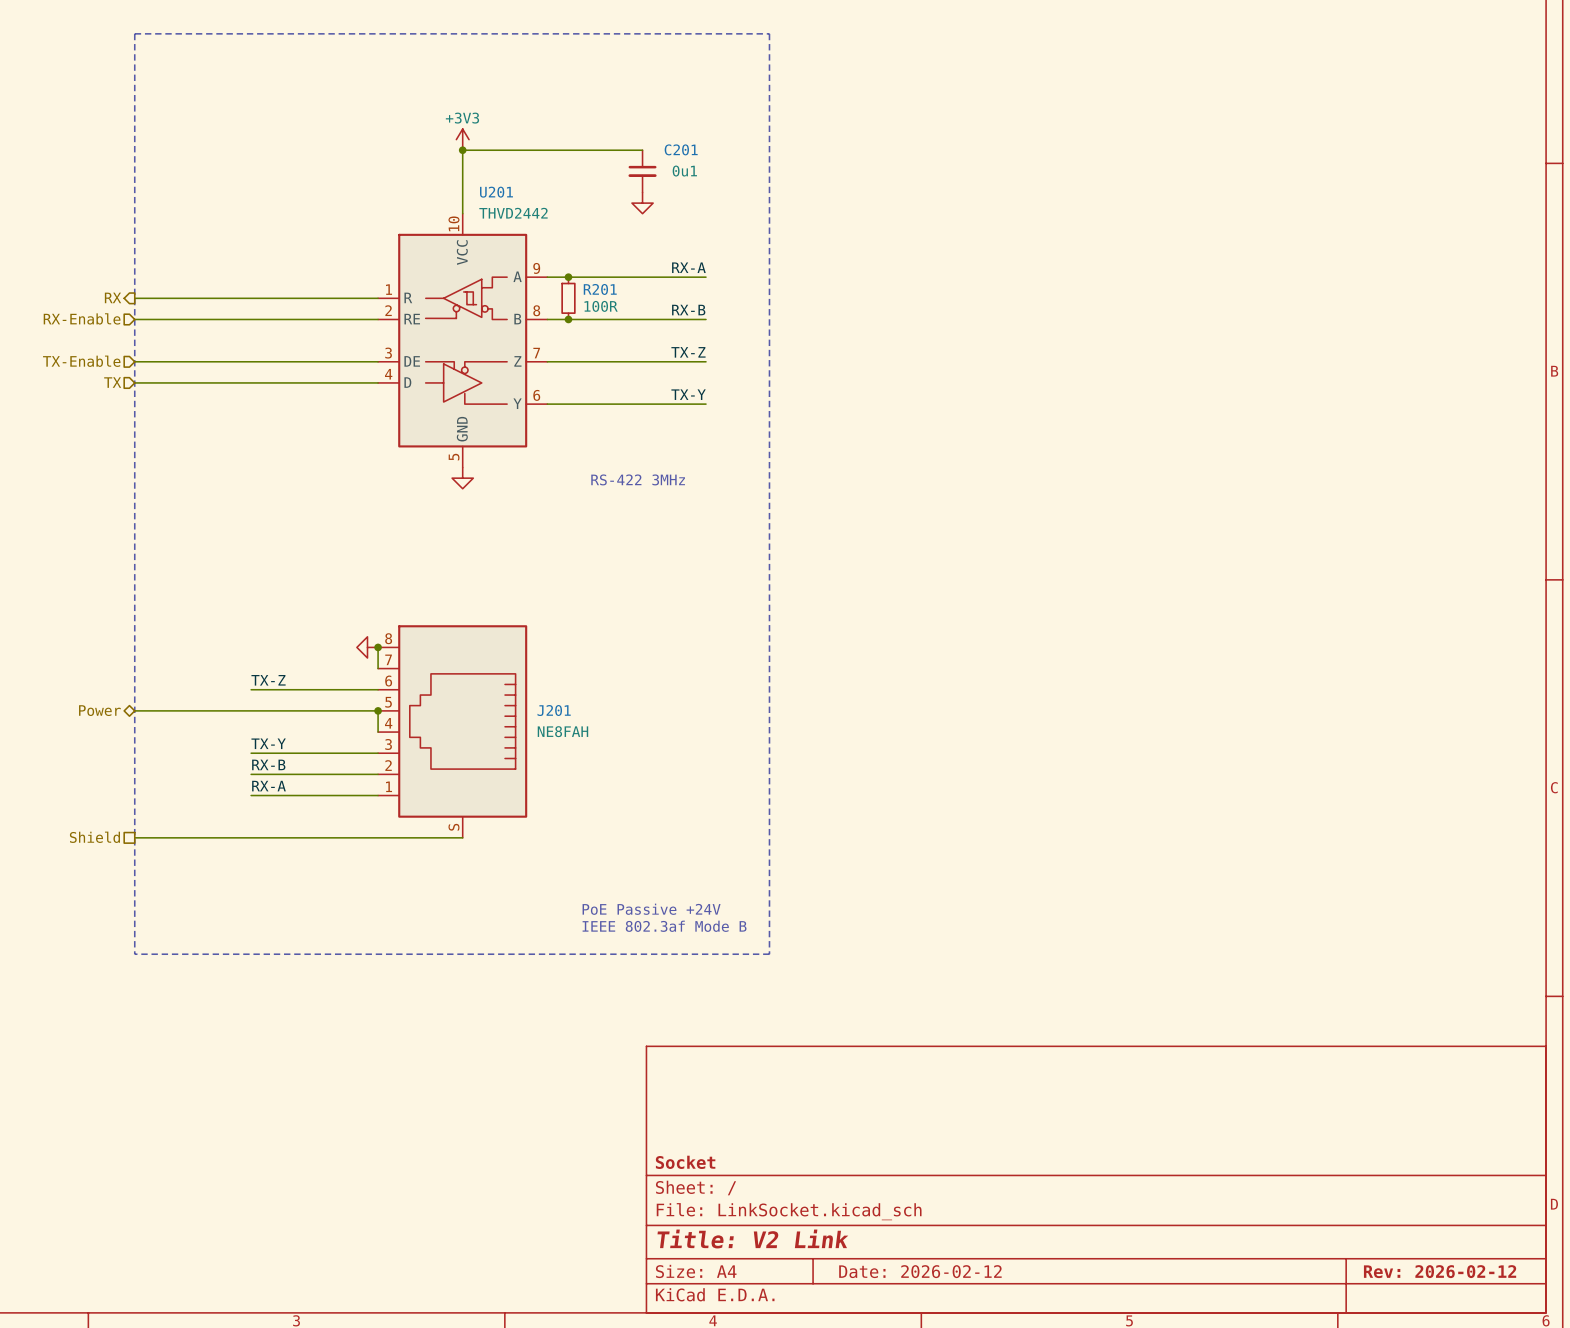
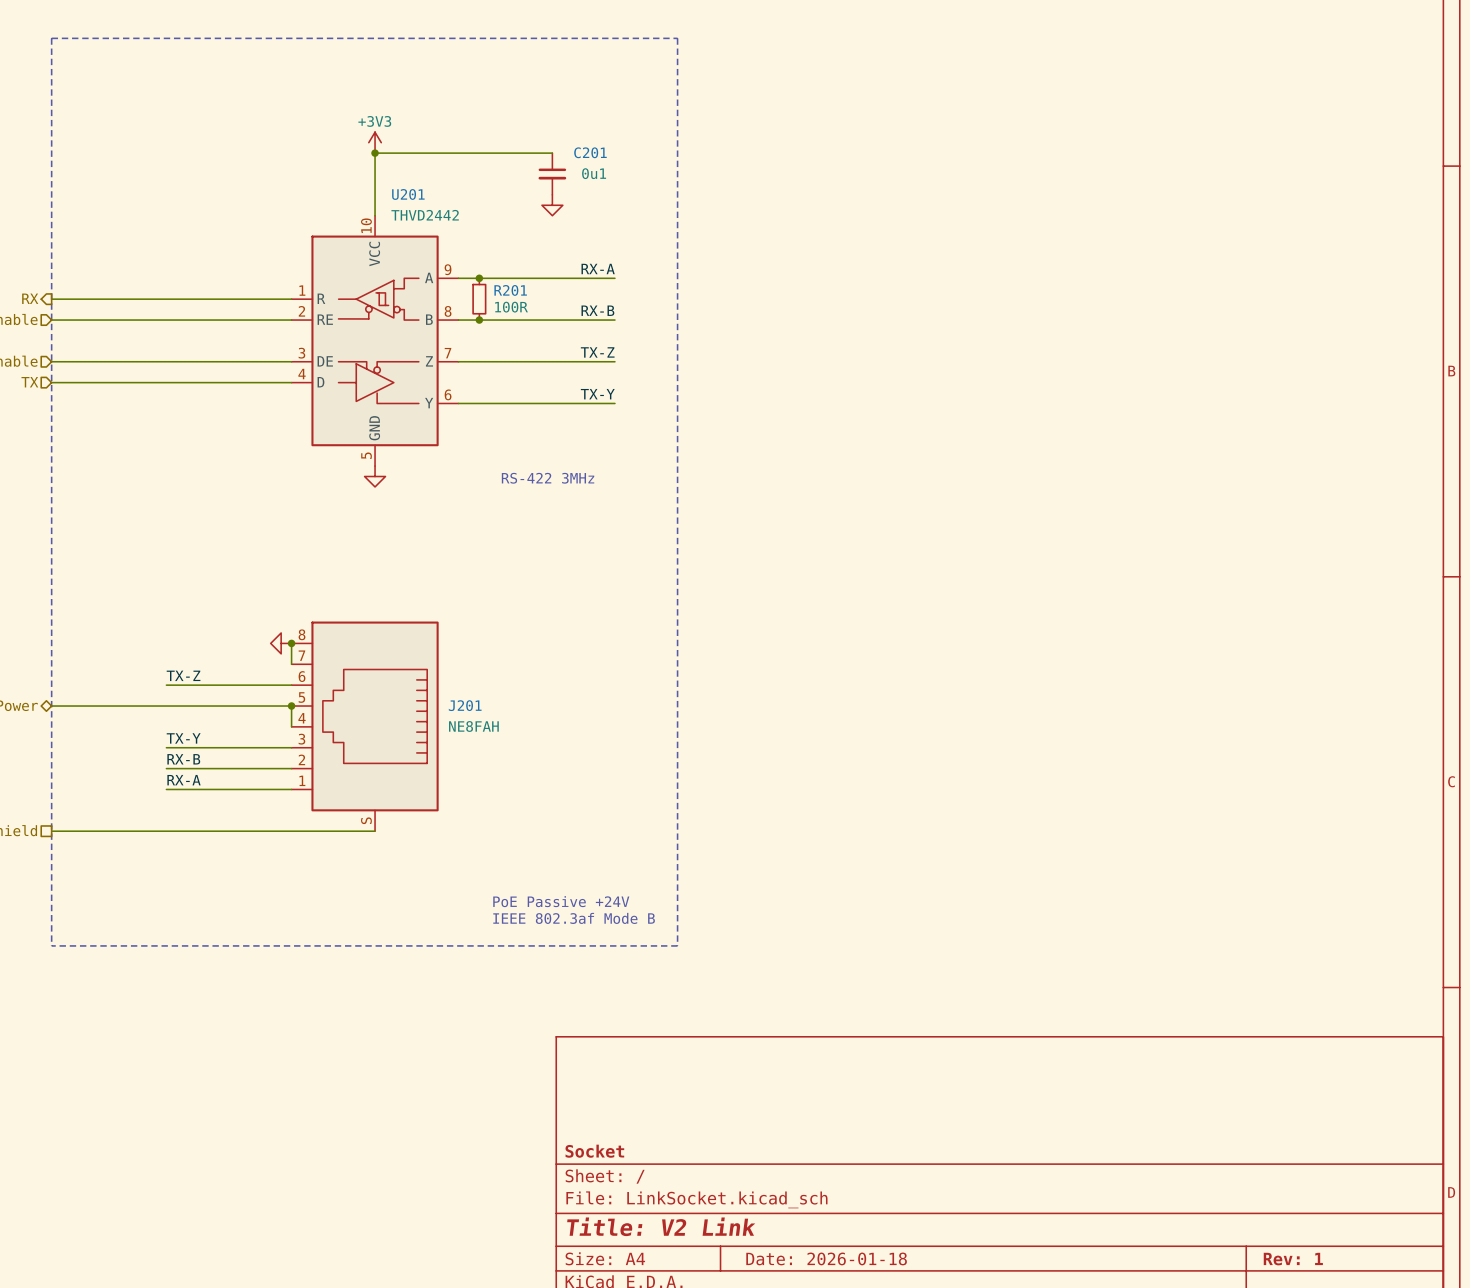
title block: Date: 2026-02-12 (920, 1271) -> Date: 2026-01-18 (826, 1258)
title block: Rev: 2026-02-12 (1440, 1271) -> Rev: 1 (1293, 1259)

